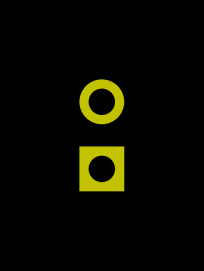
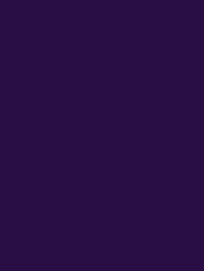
part: (101, 135) -> none

